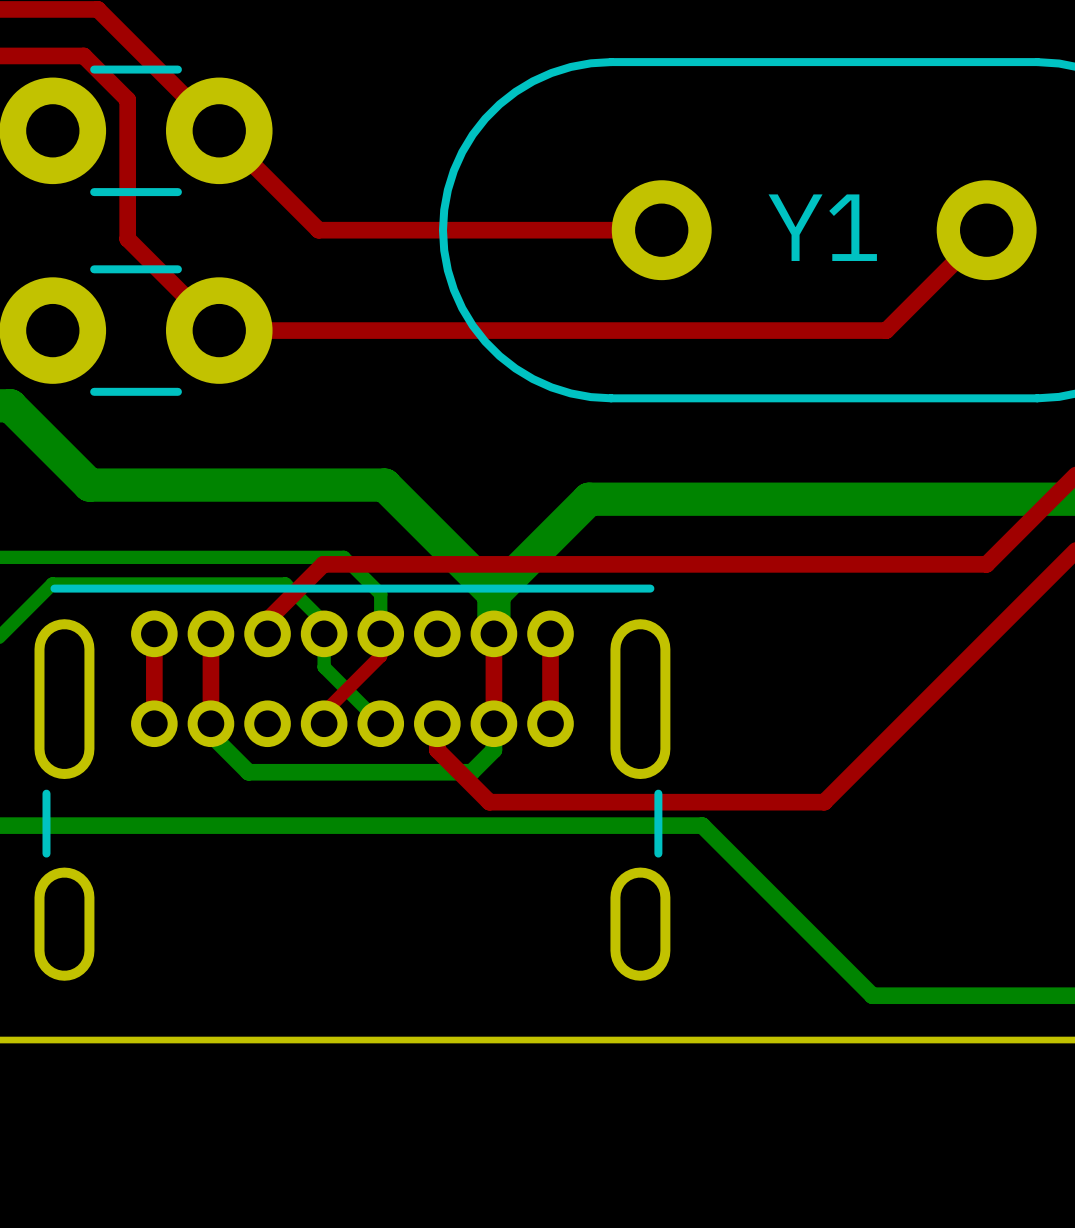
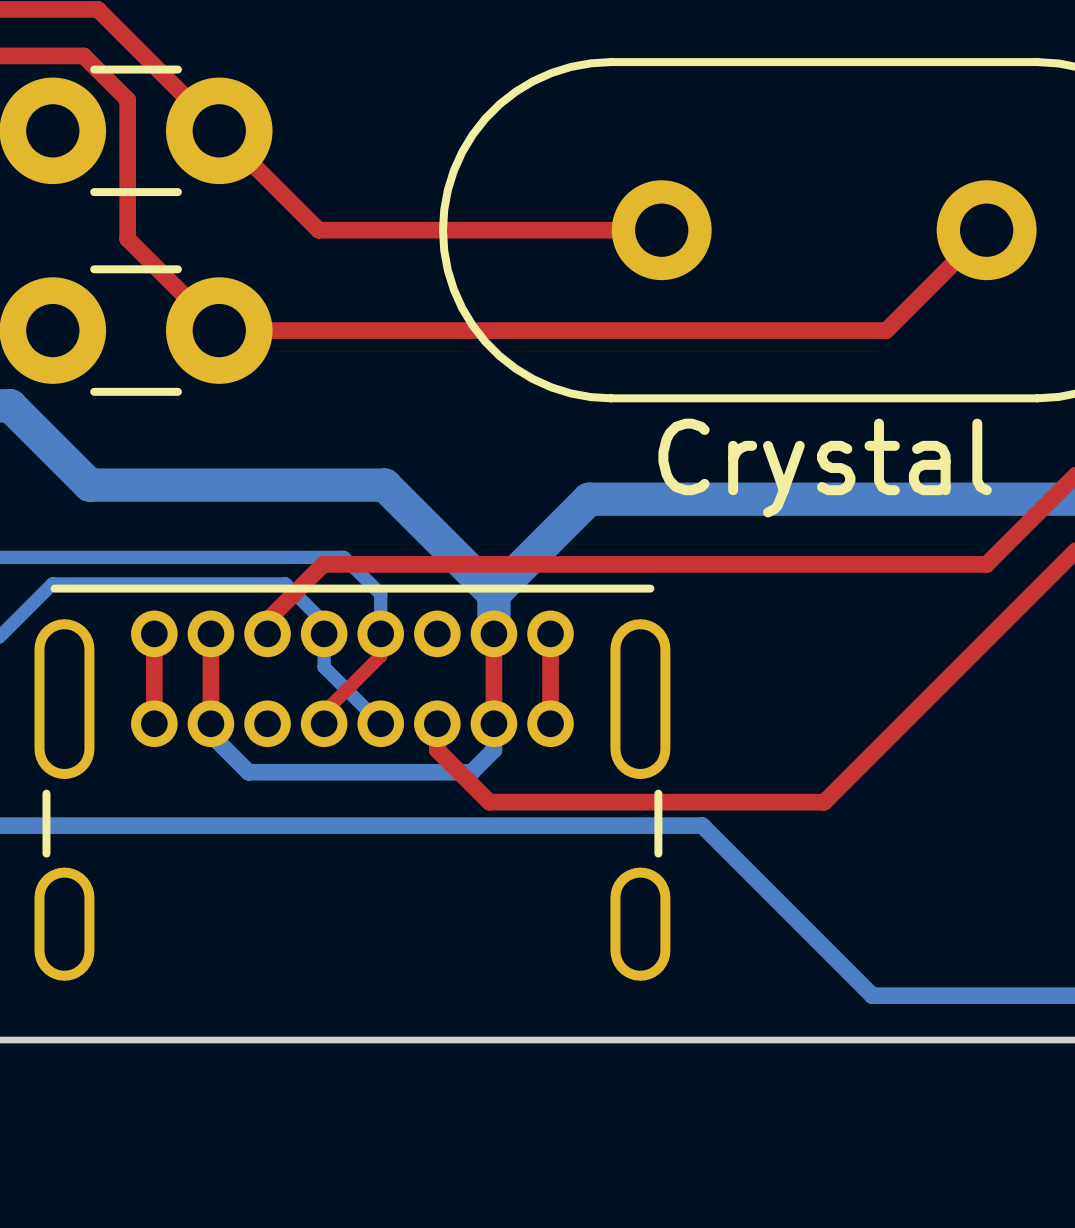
Y1 name: Y1 (822, 227) -> none
Y1 text: none -> Crystal (825, 468)

